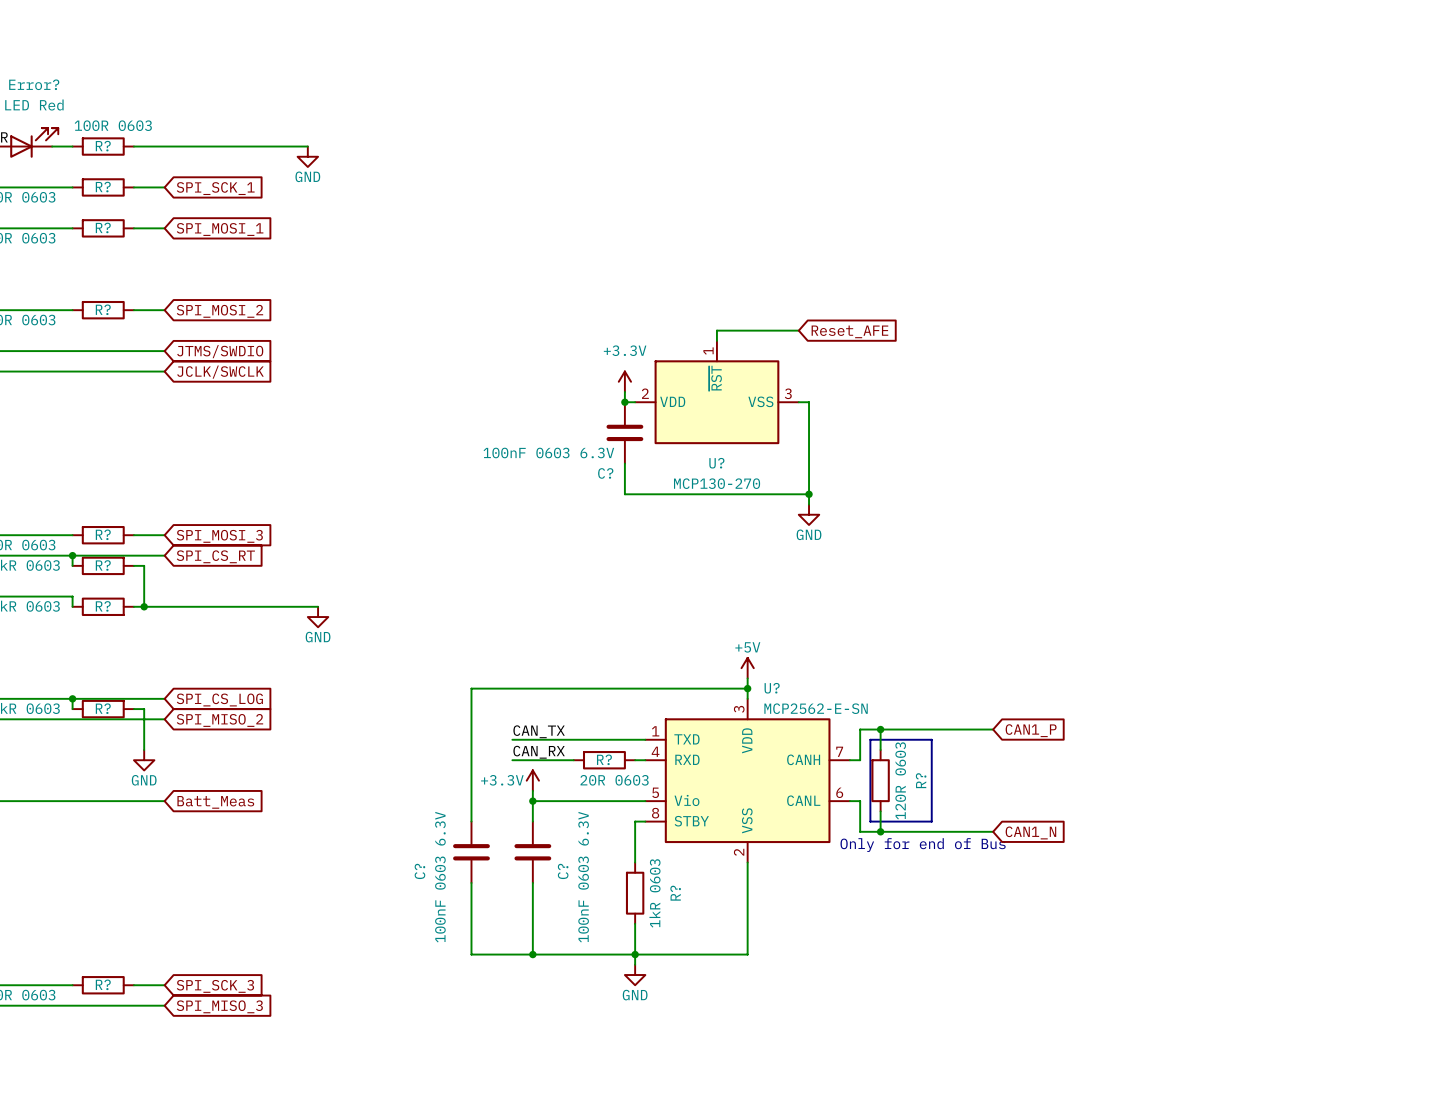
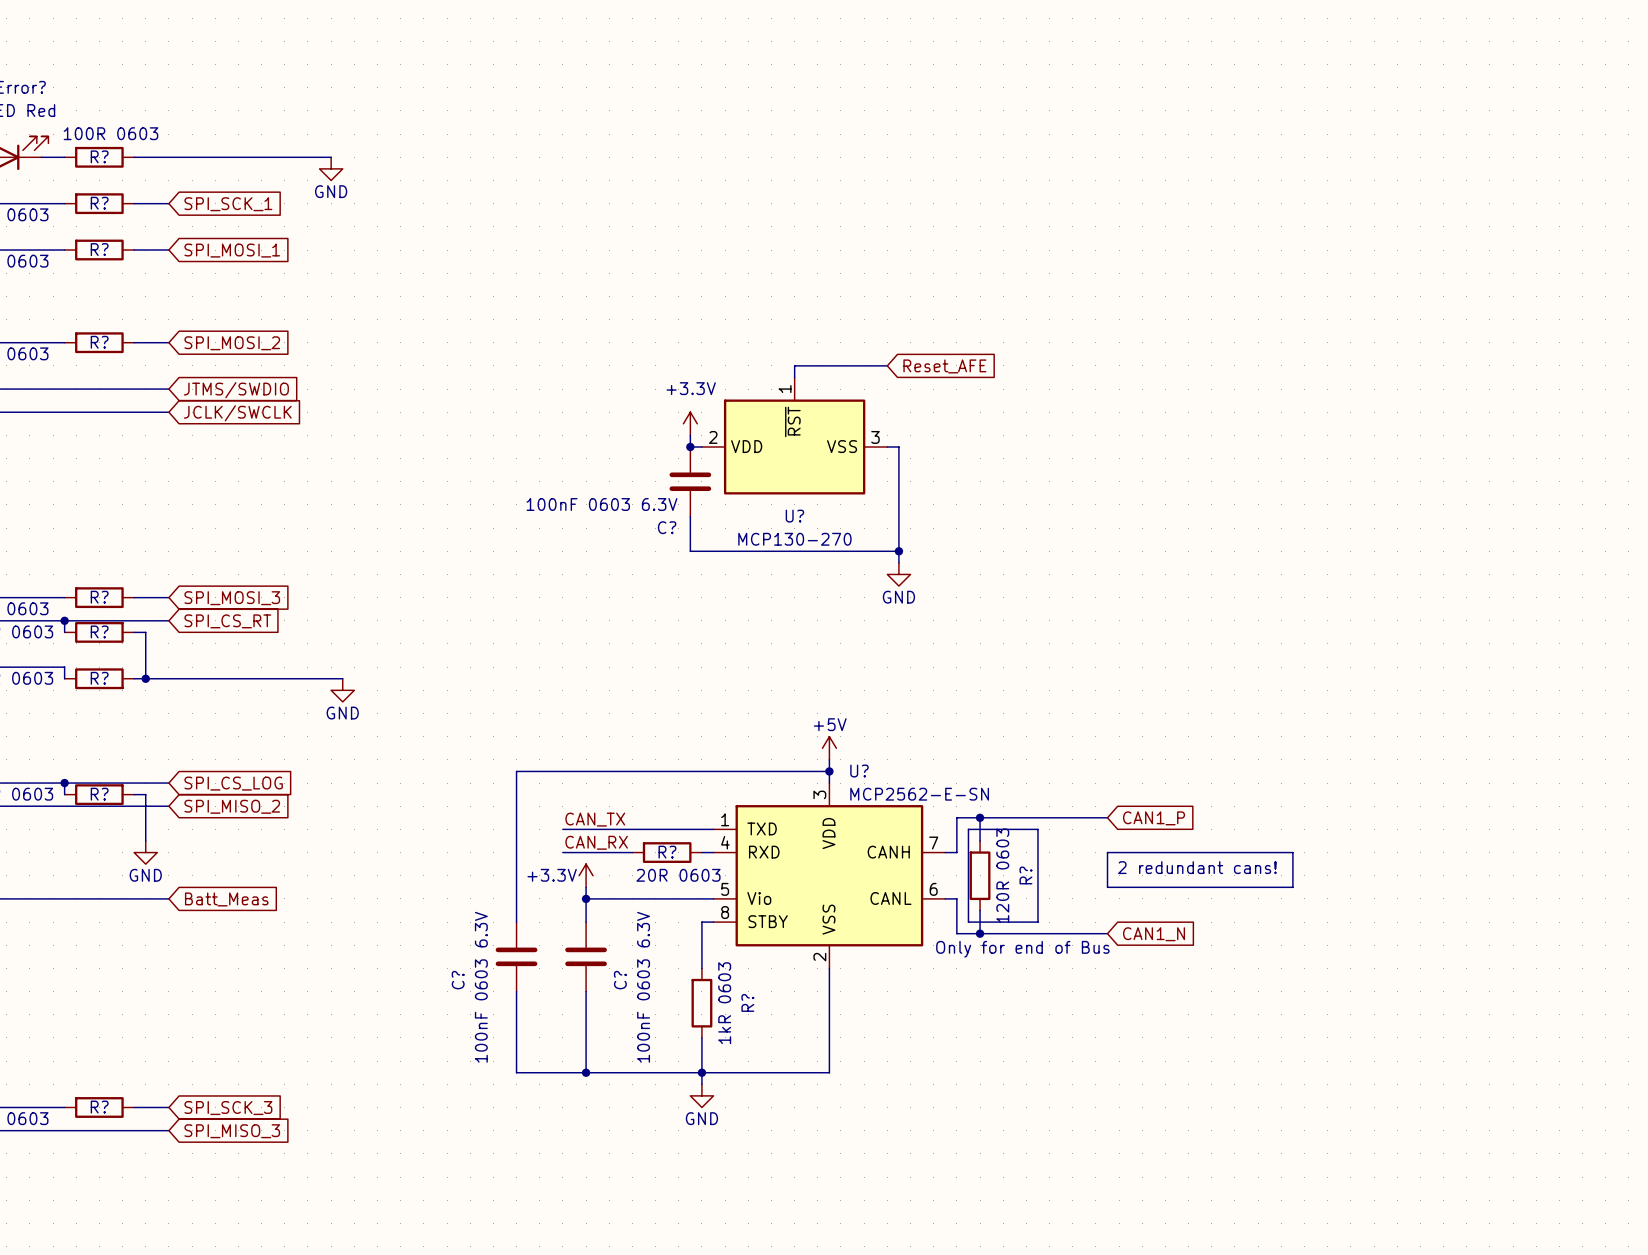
line: none -> (1107, 852) (1292, 852) (1292, 887) (1107, 887) (1107, 852)
text: none -> 2 redundant cans! (1197, 867)

